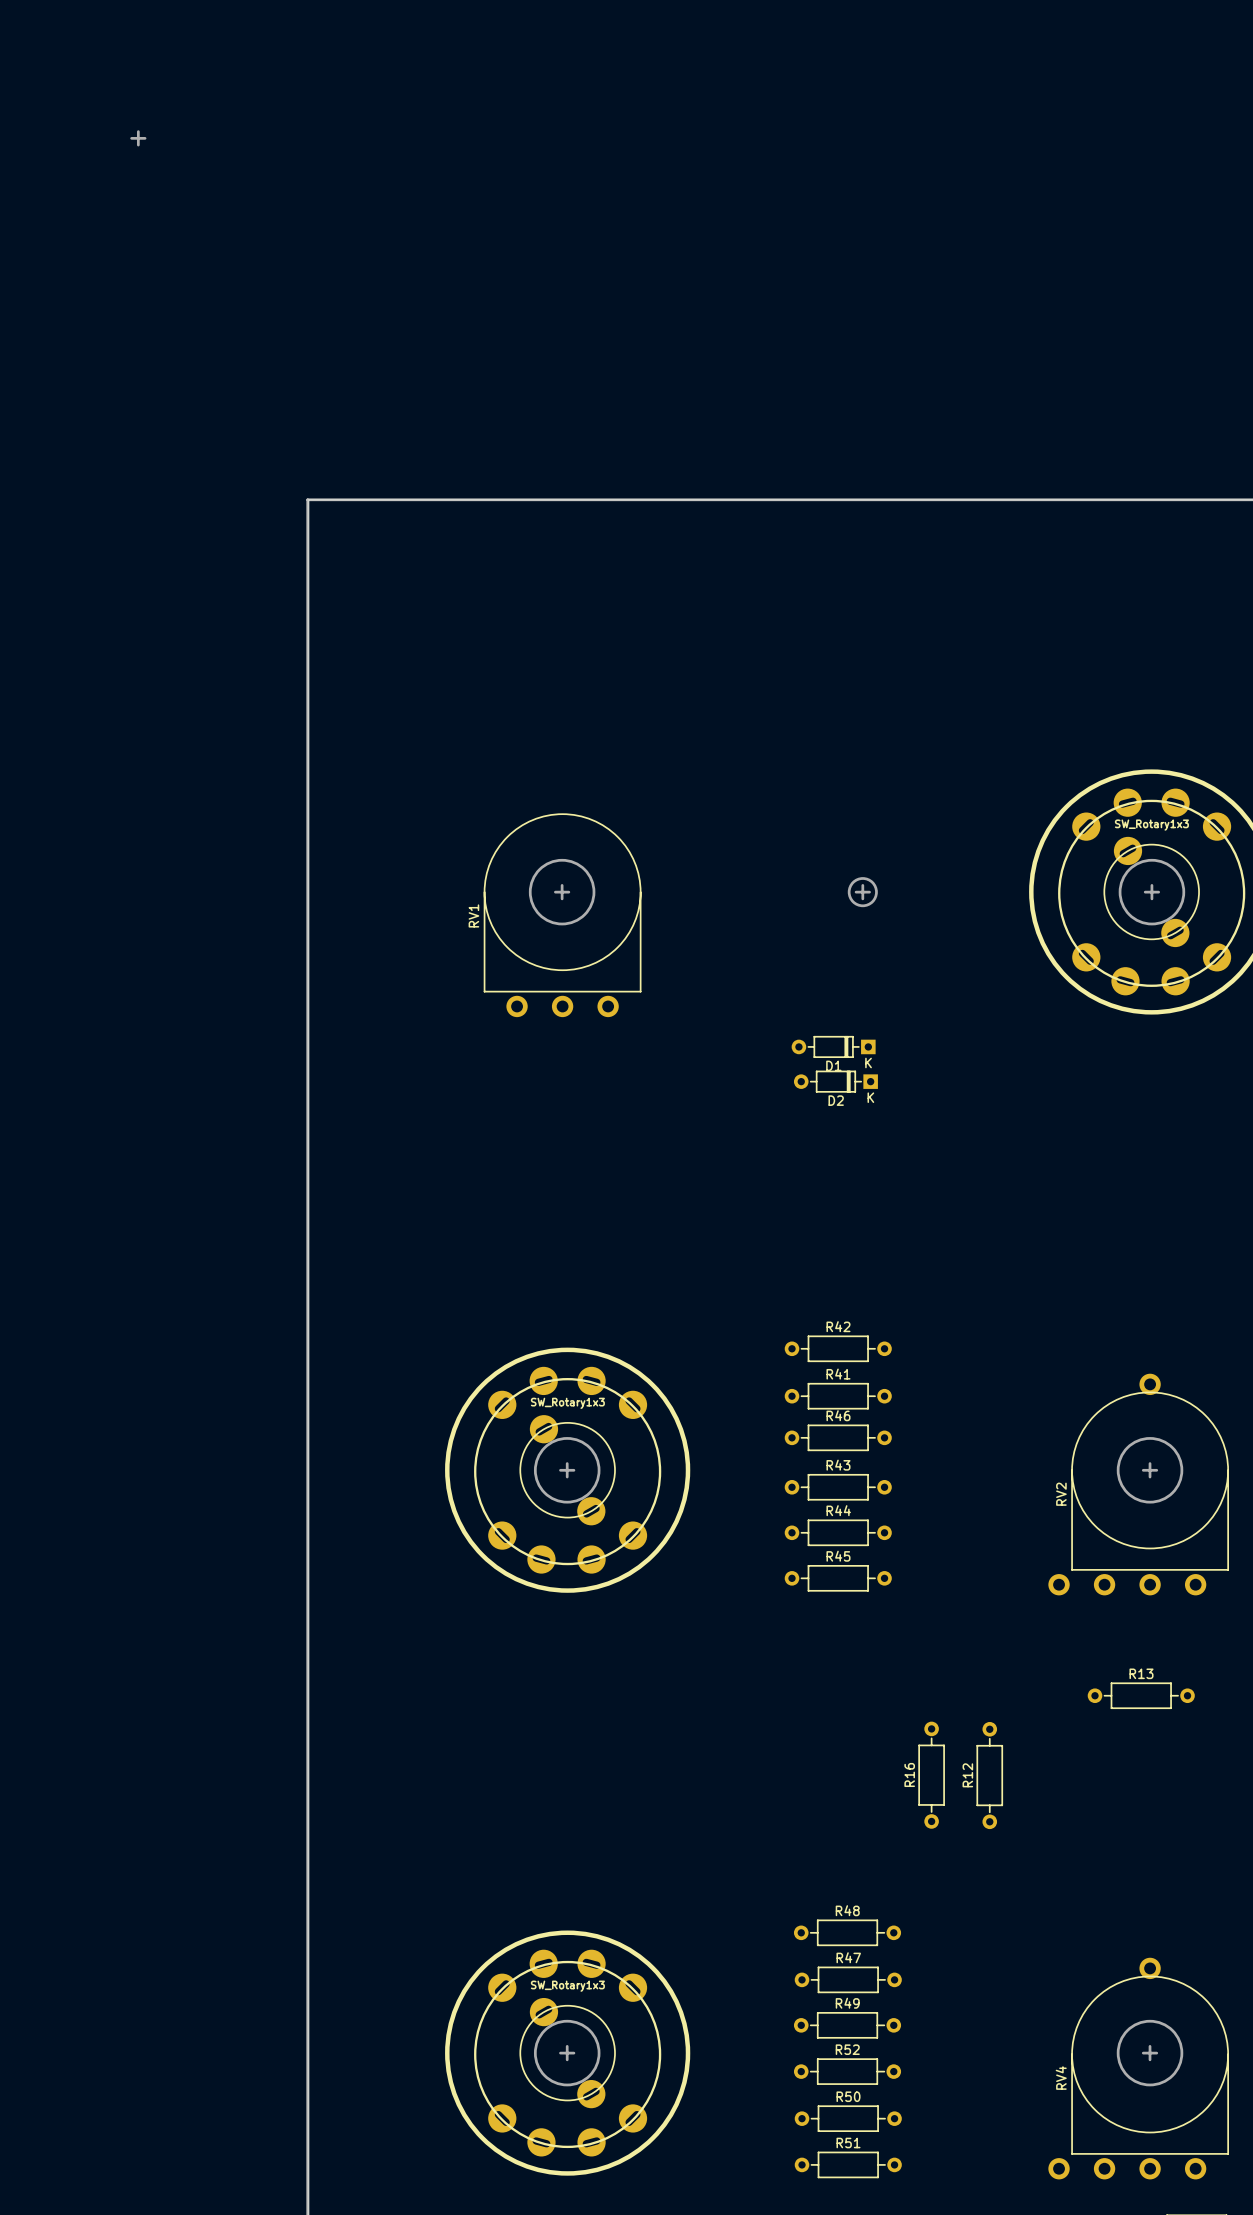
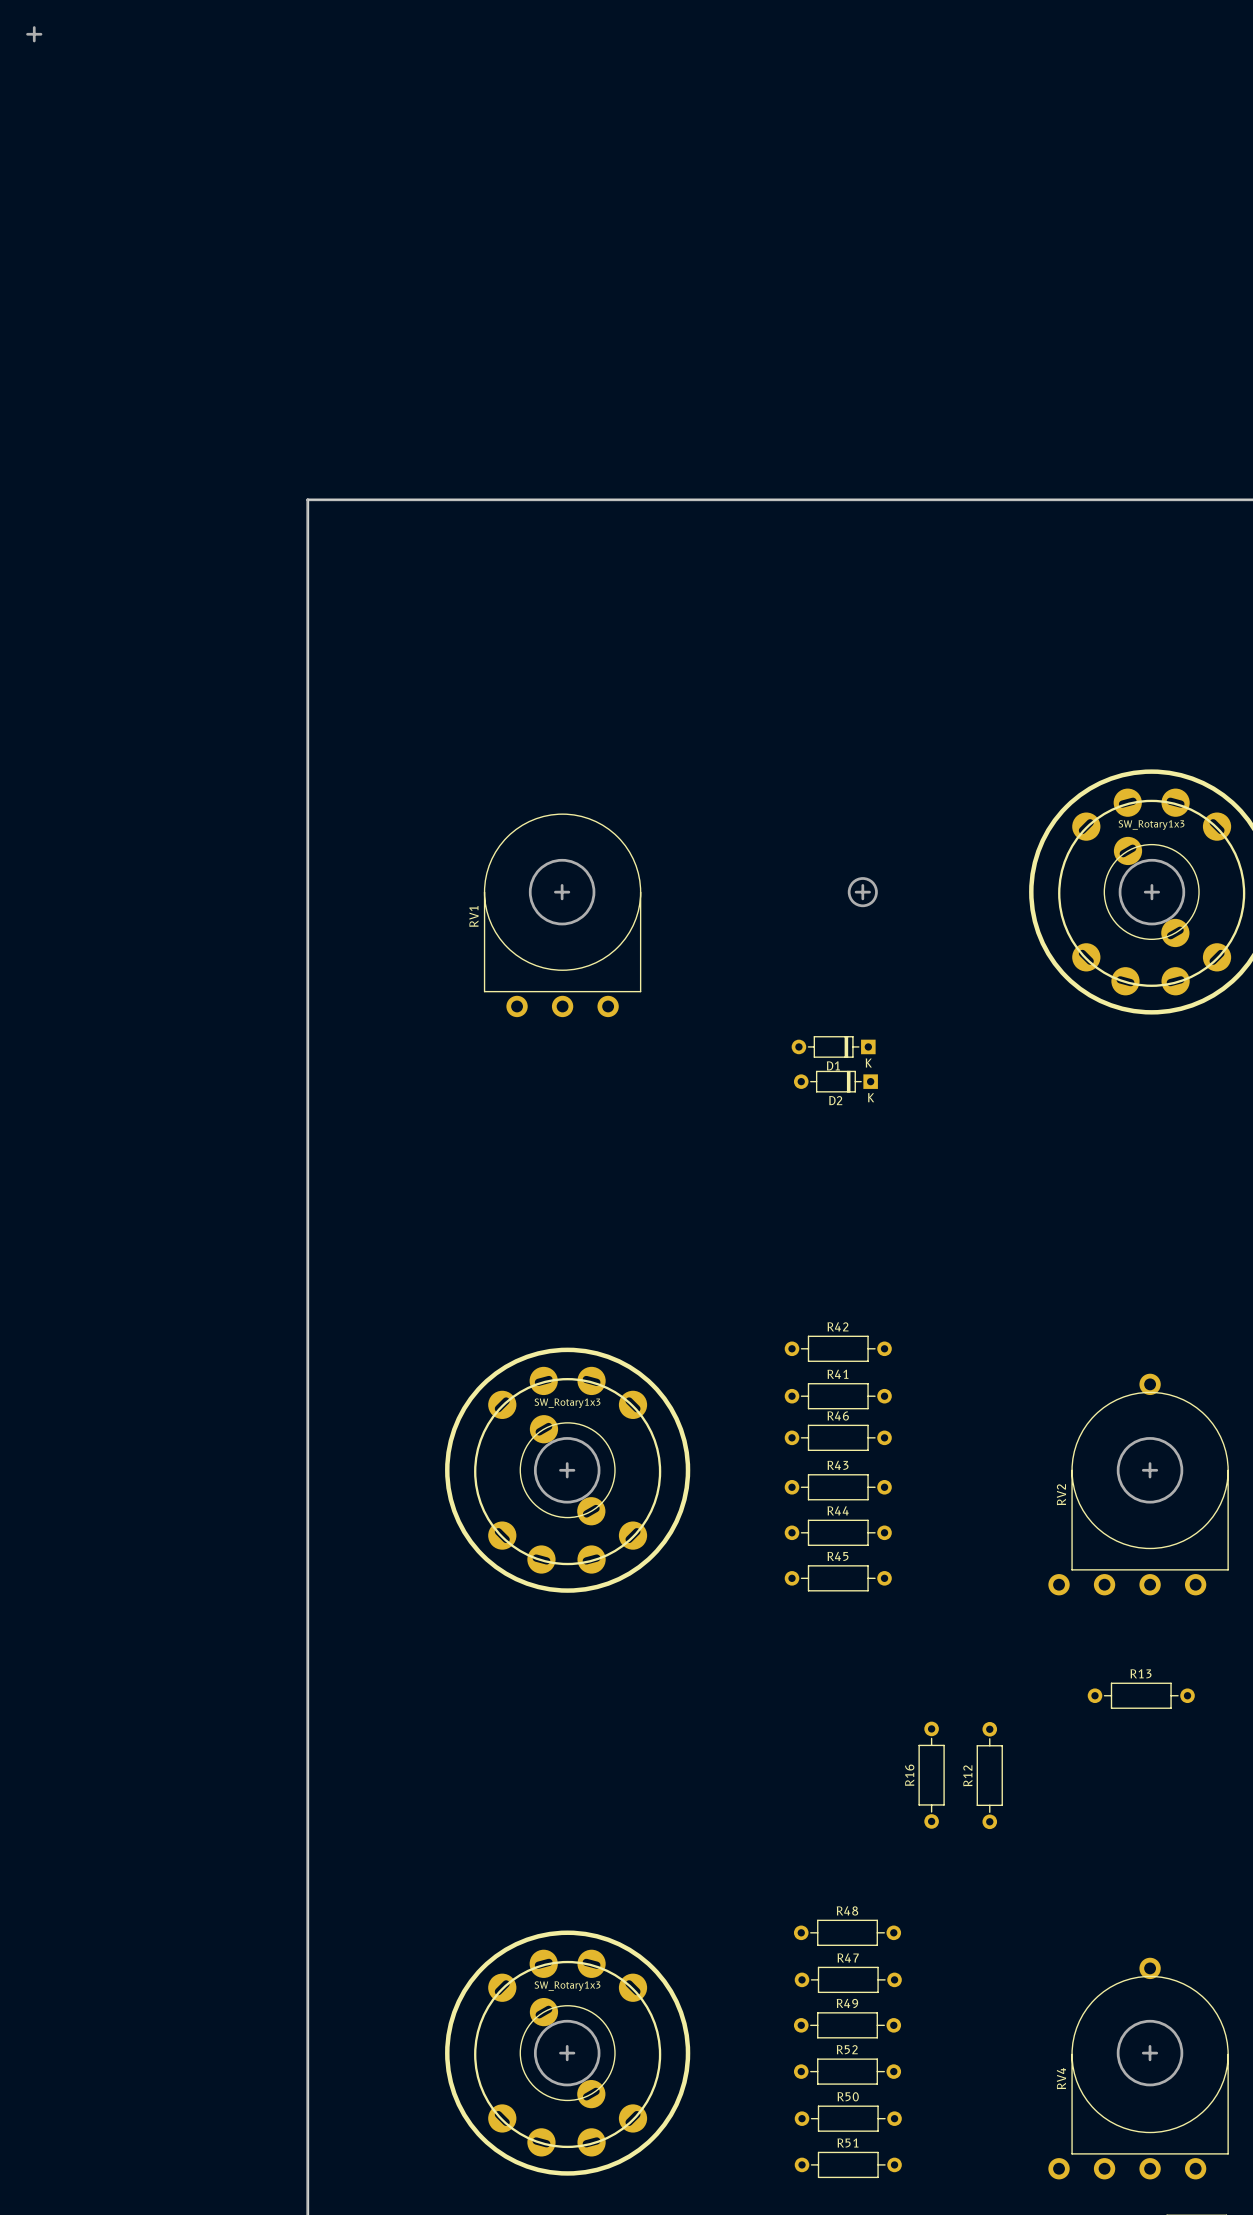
line: (138, 131) (138, 145) -> (34, 27) (34, 41)
line: (131, 138) (145, 138) -> (27, 34) (41, 34)

